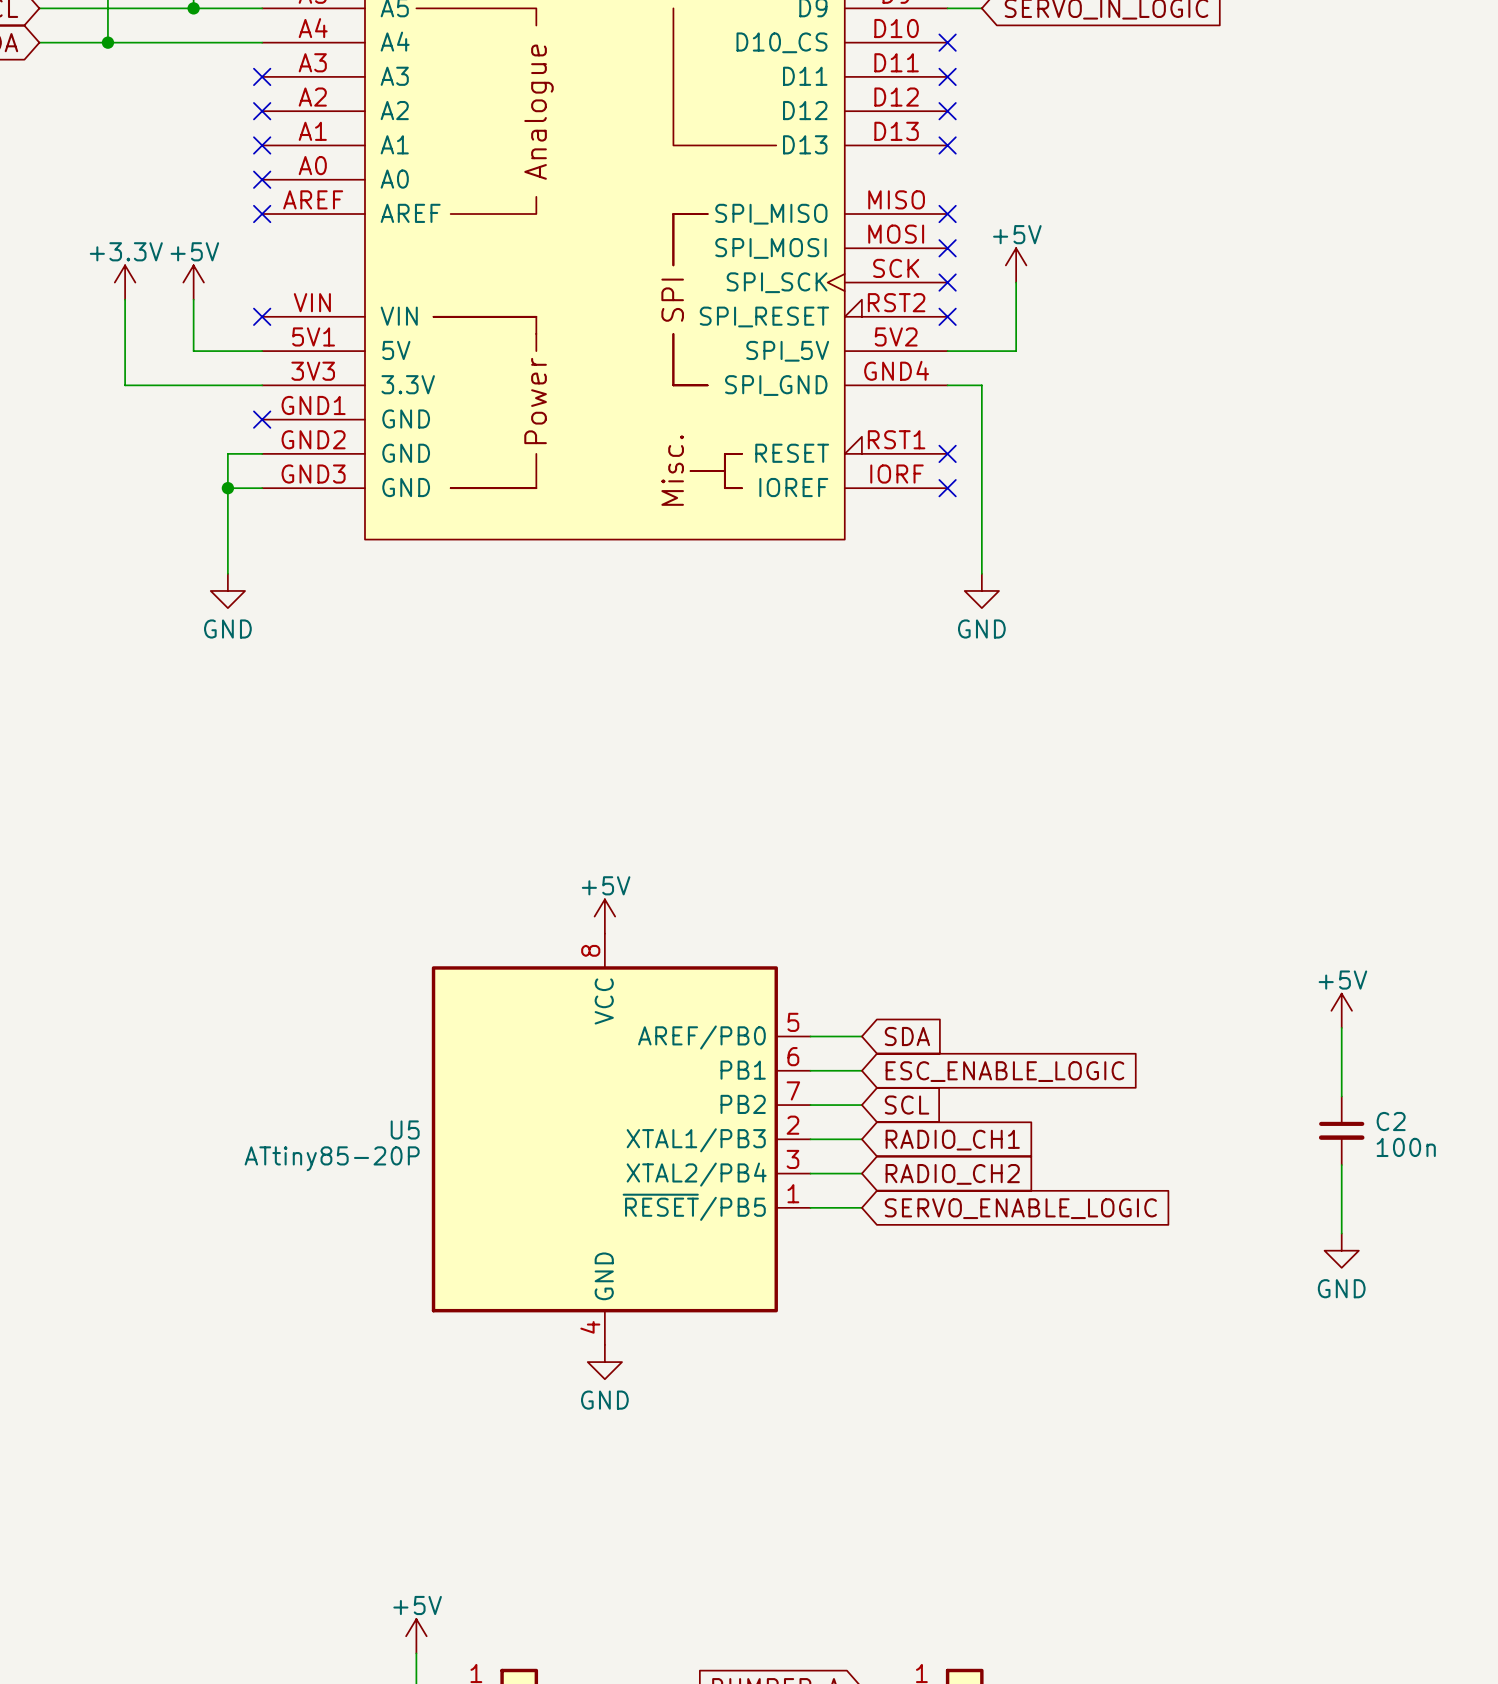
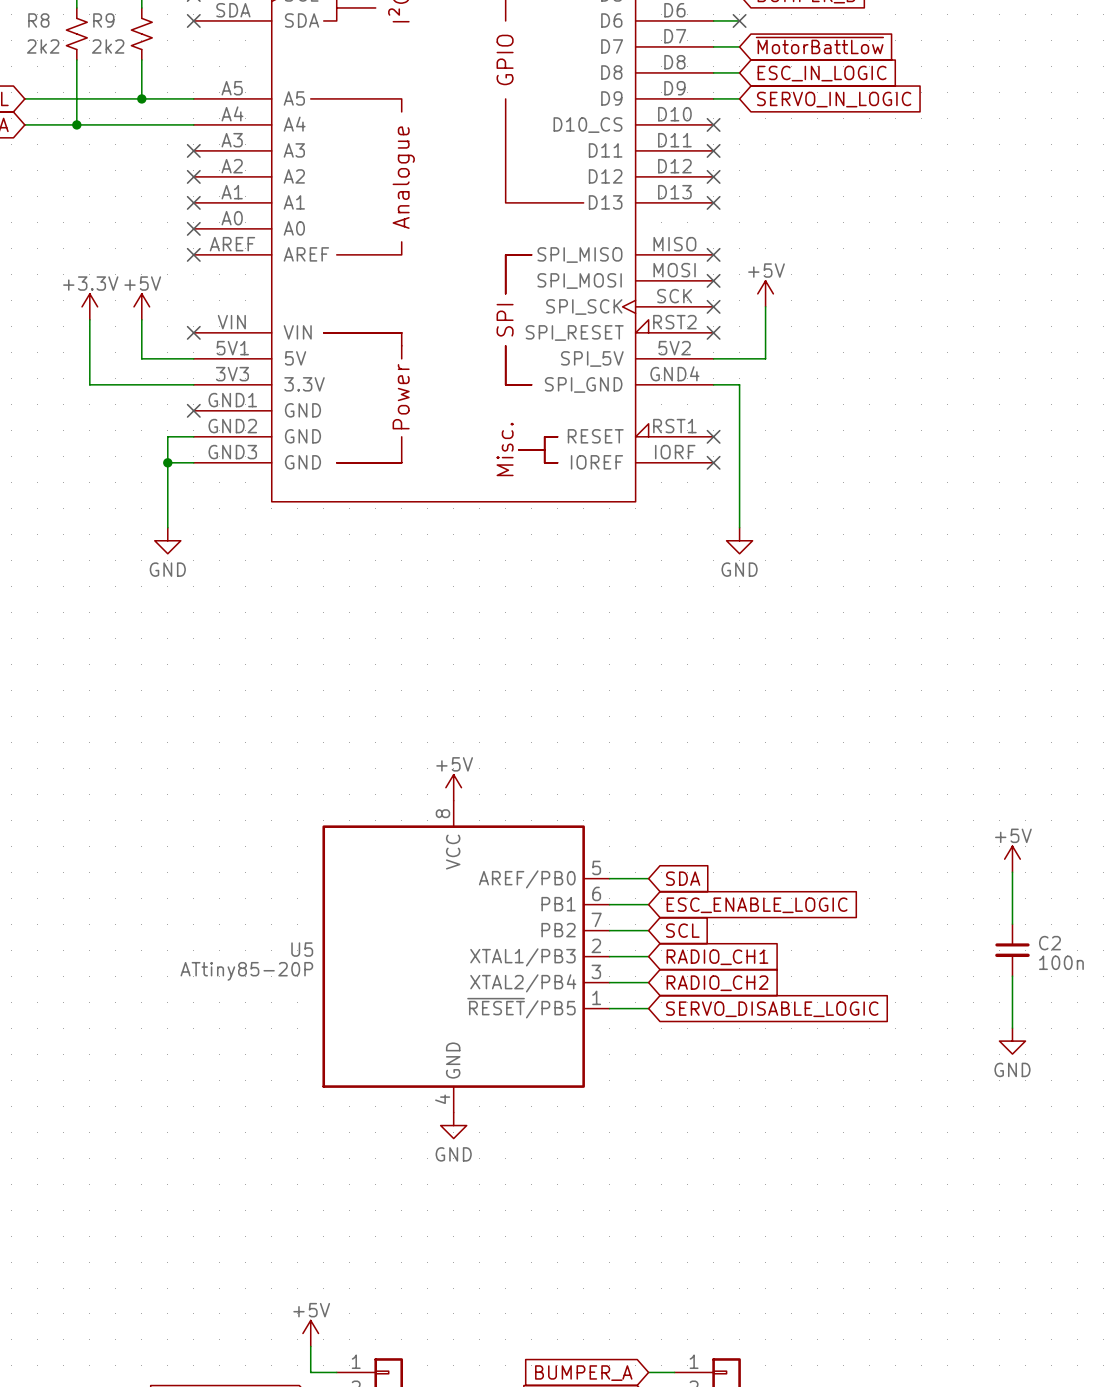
global label: SERVO_ENABLE_LOGIC (1020, 1208) -> SERVO_DISABLE_LOGIC (772, 1009)

